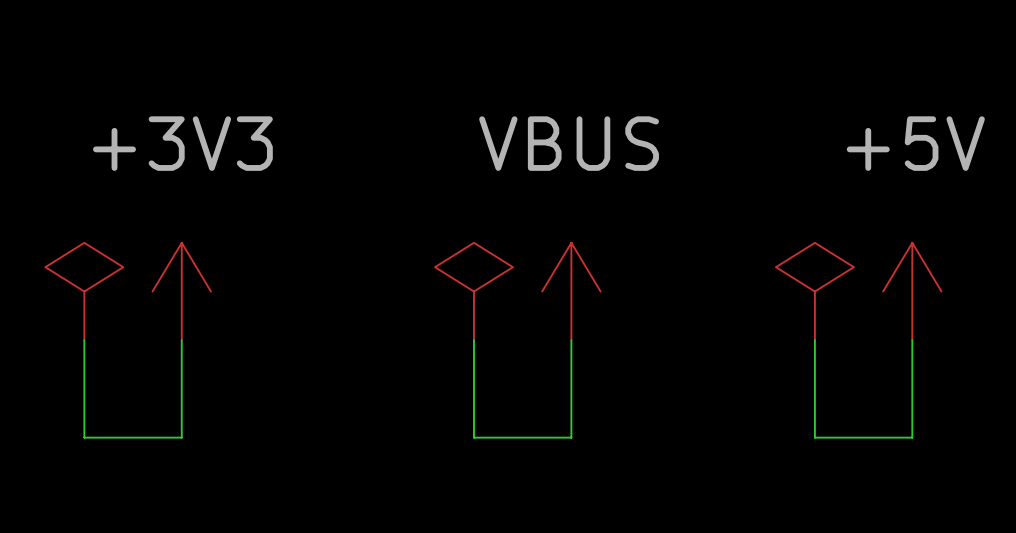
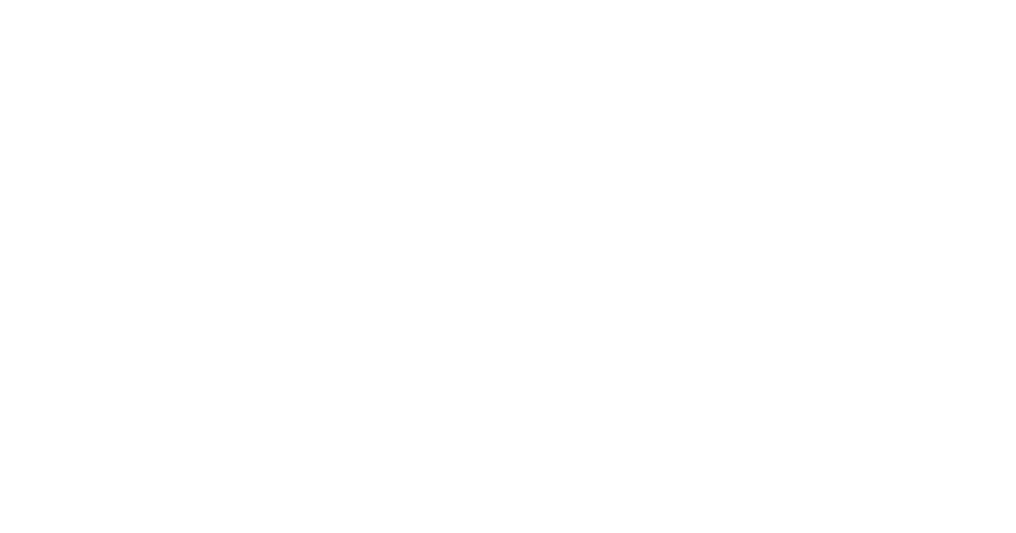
power symbol: (84, 291) -> none
power symbol: +3V3 (181, 291) -> none
power symbol: (473, 291) -> none
power symbol: VBUS (571, 291) -> none
power symbol: (814, 291) -> none
power symbol: +5V (912, 291) -> none
wire: (84, 340) (84, 437) (181, 437) (181, 340) -> none
wire: (473, 340) (473, 437) (571, 437) (571, 340) -> none
wire: (814, 340) (814, 437) (912, 437) (912, 340) -> none

